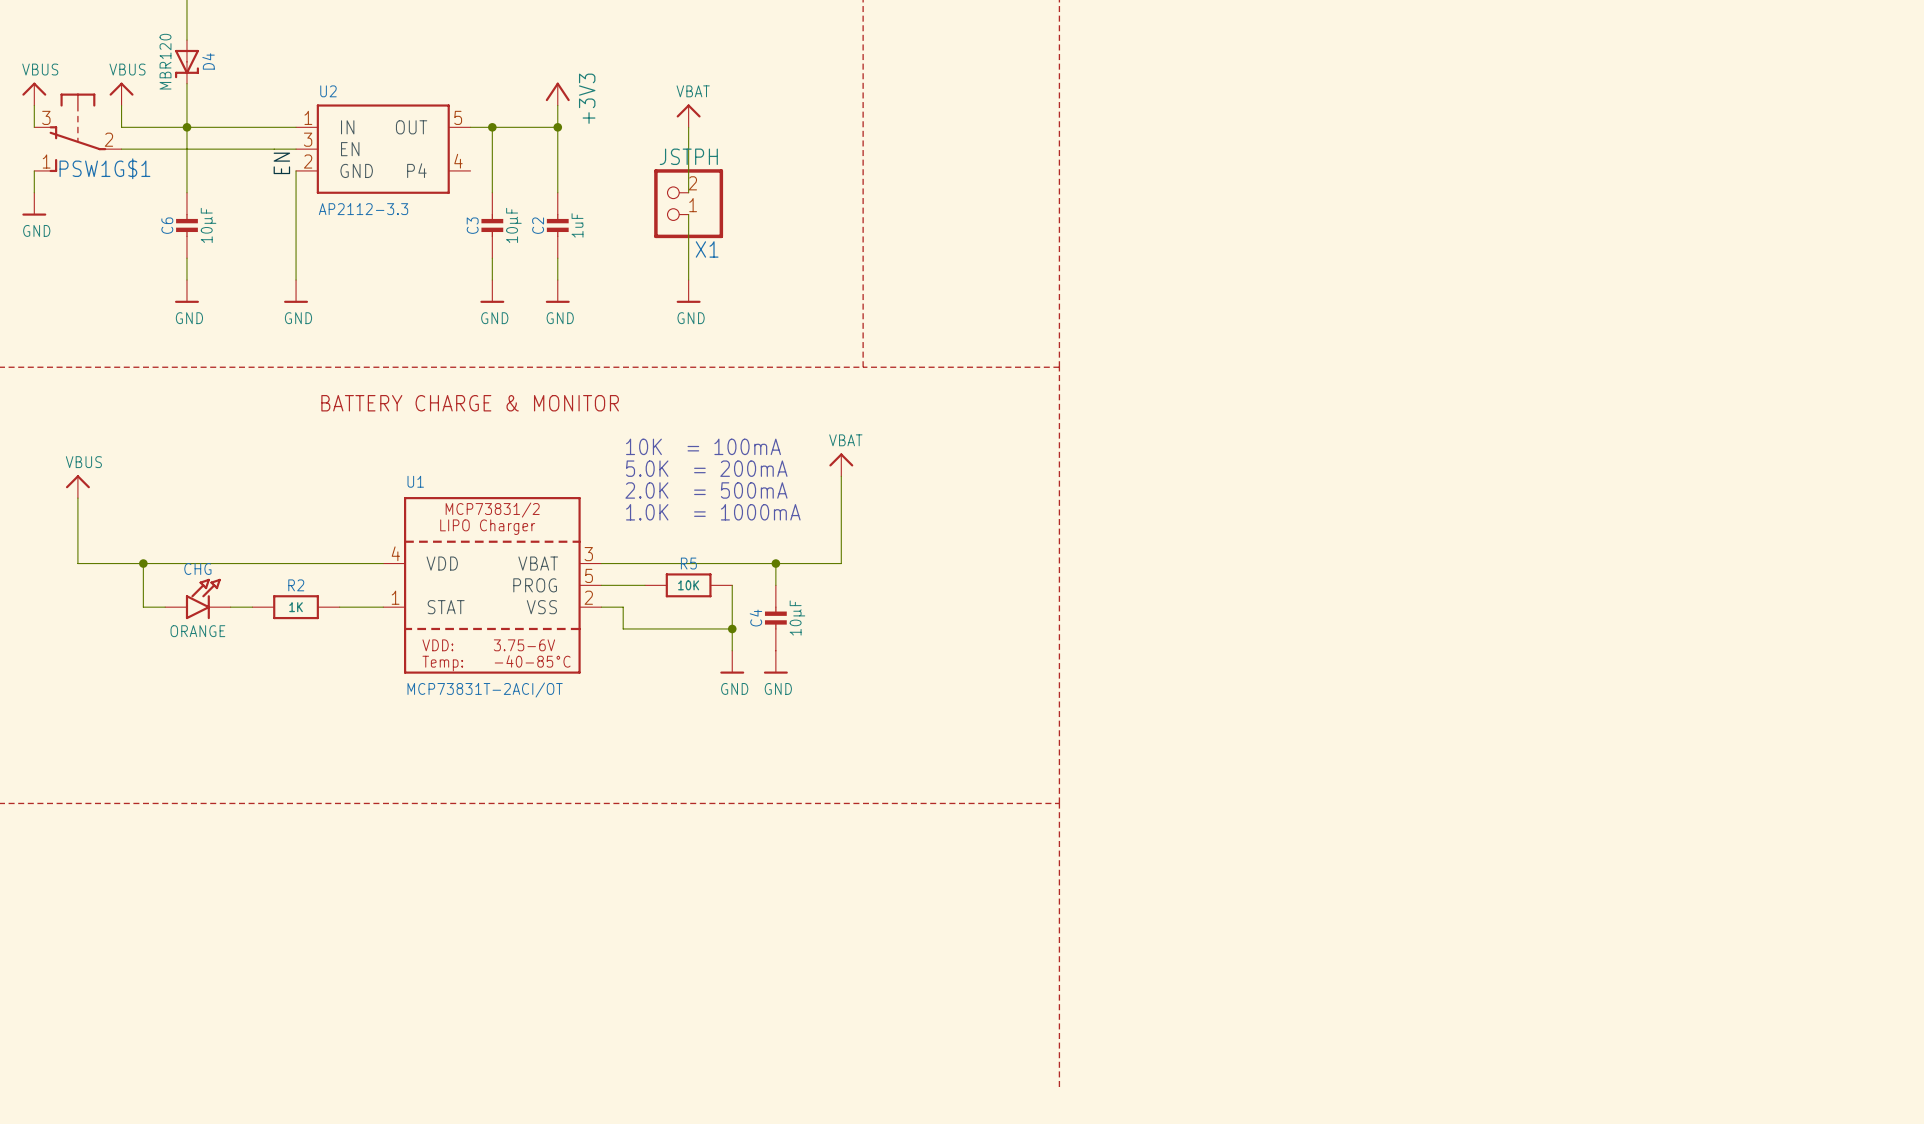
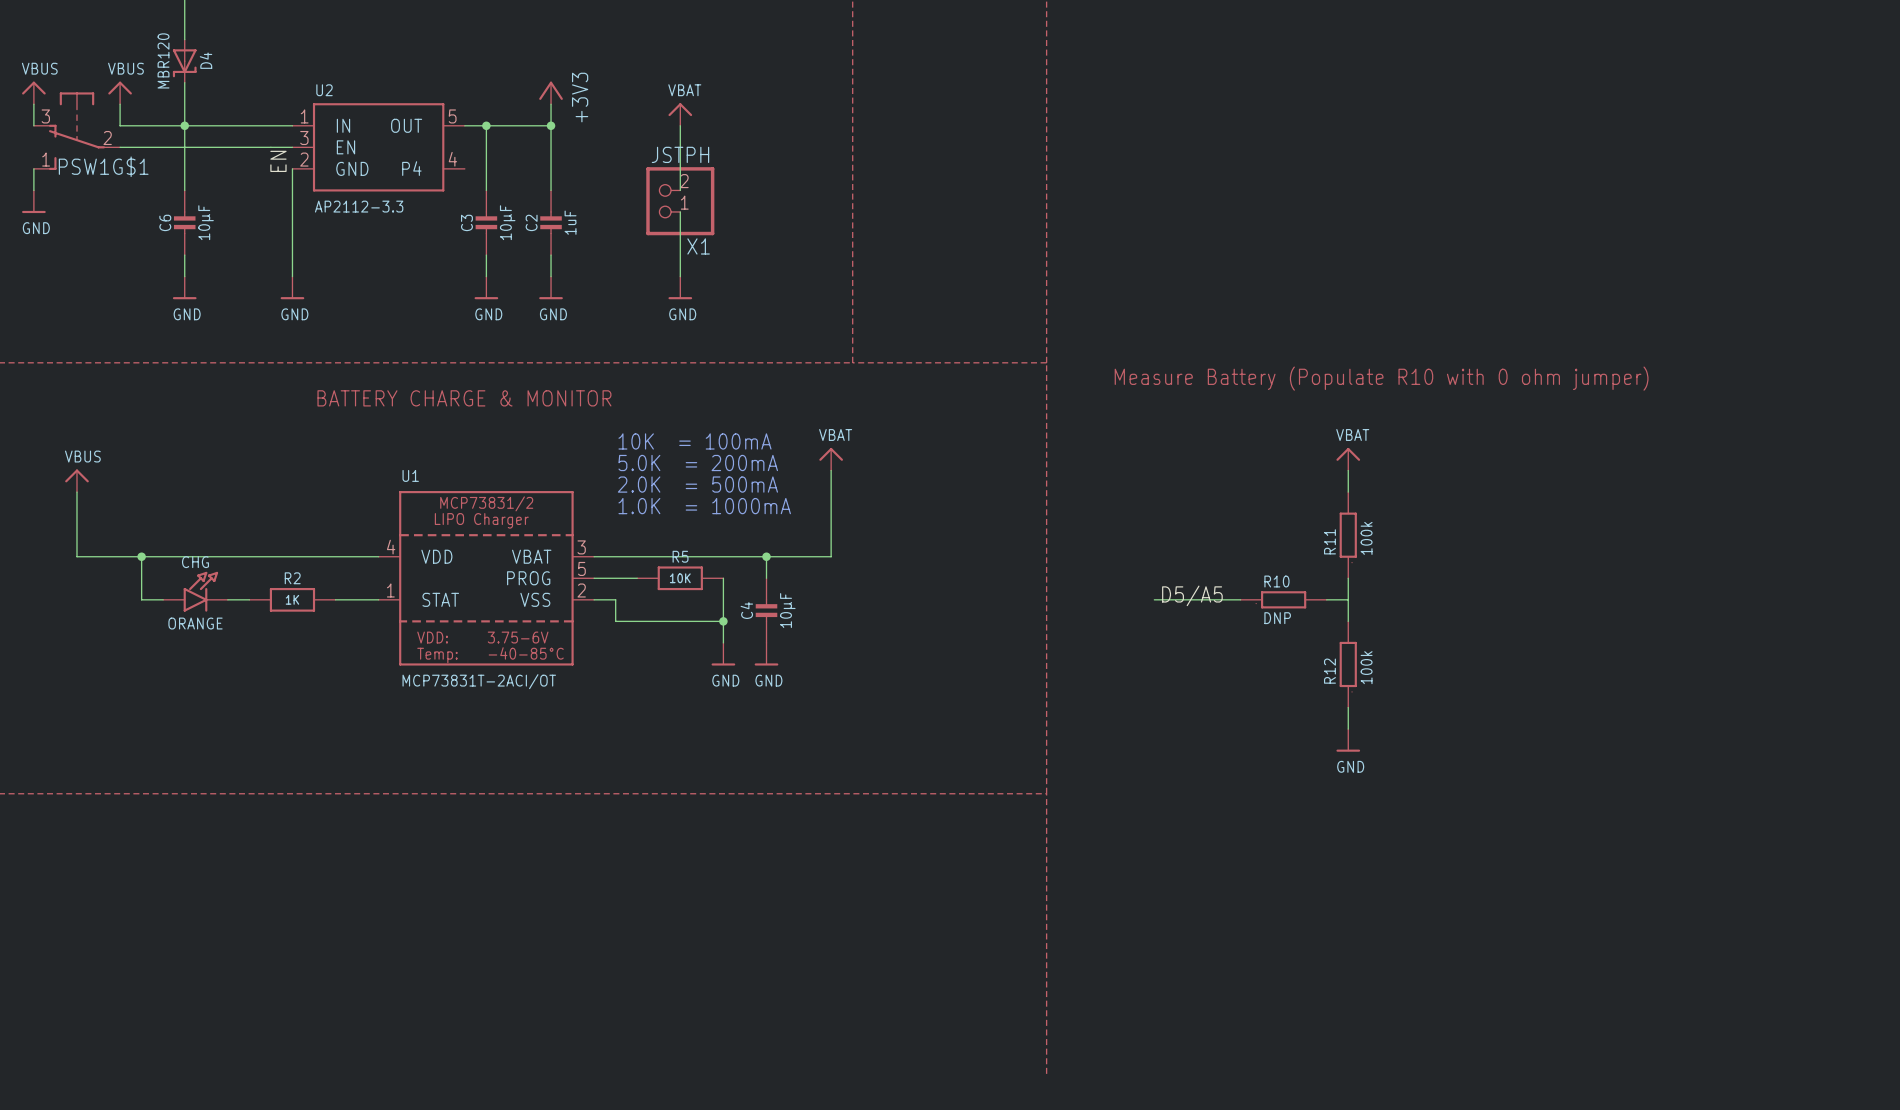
text: none -> Measure Battery (Populate R10 with 0 ohm jumper) (1381, 378)
power symbol: none -> VBAT (1348, 459)
wire: none -> (1348, 470) (1348, 492)
R11: none -> 100k (1348, 535)
wire: none -> (1348, 578) (1348, 621)
label: none -> D5/A5 (1192, 595)
wire: none -> (1154, 599) (1240, 599)
R10: none -> DNP (1283, 599)
wire: none -> (1326, 599) (1348, 599)
R12: none -> 100k (1348, 664)
wire: none -> (1348, 707) (1348, 729)
power symbol: none -> GND (1348, 740)

